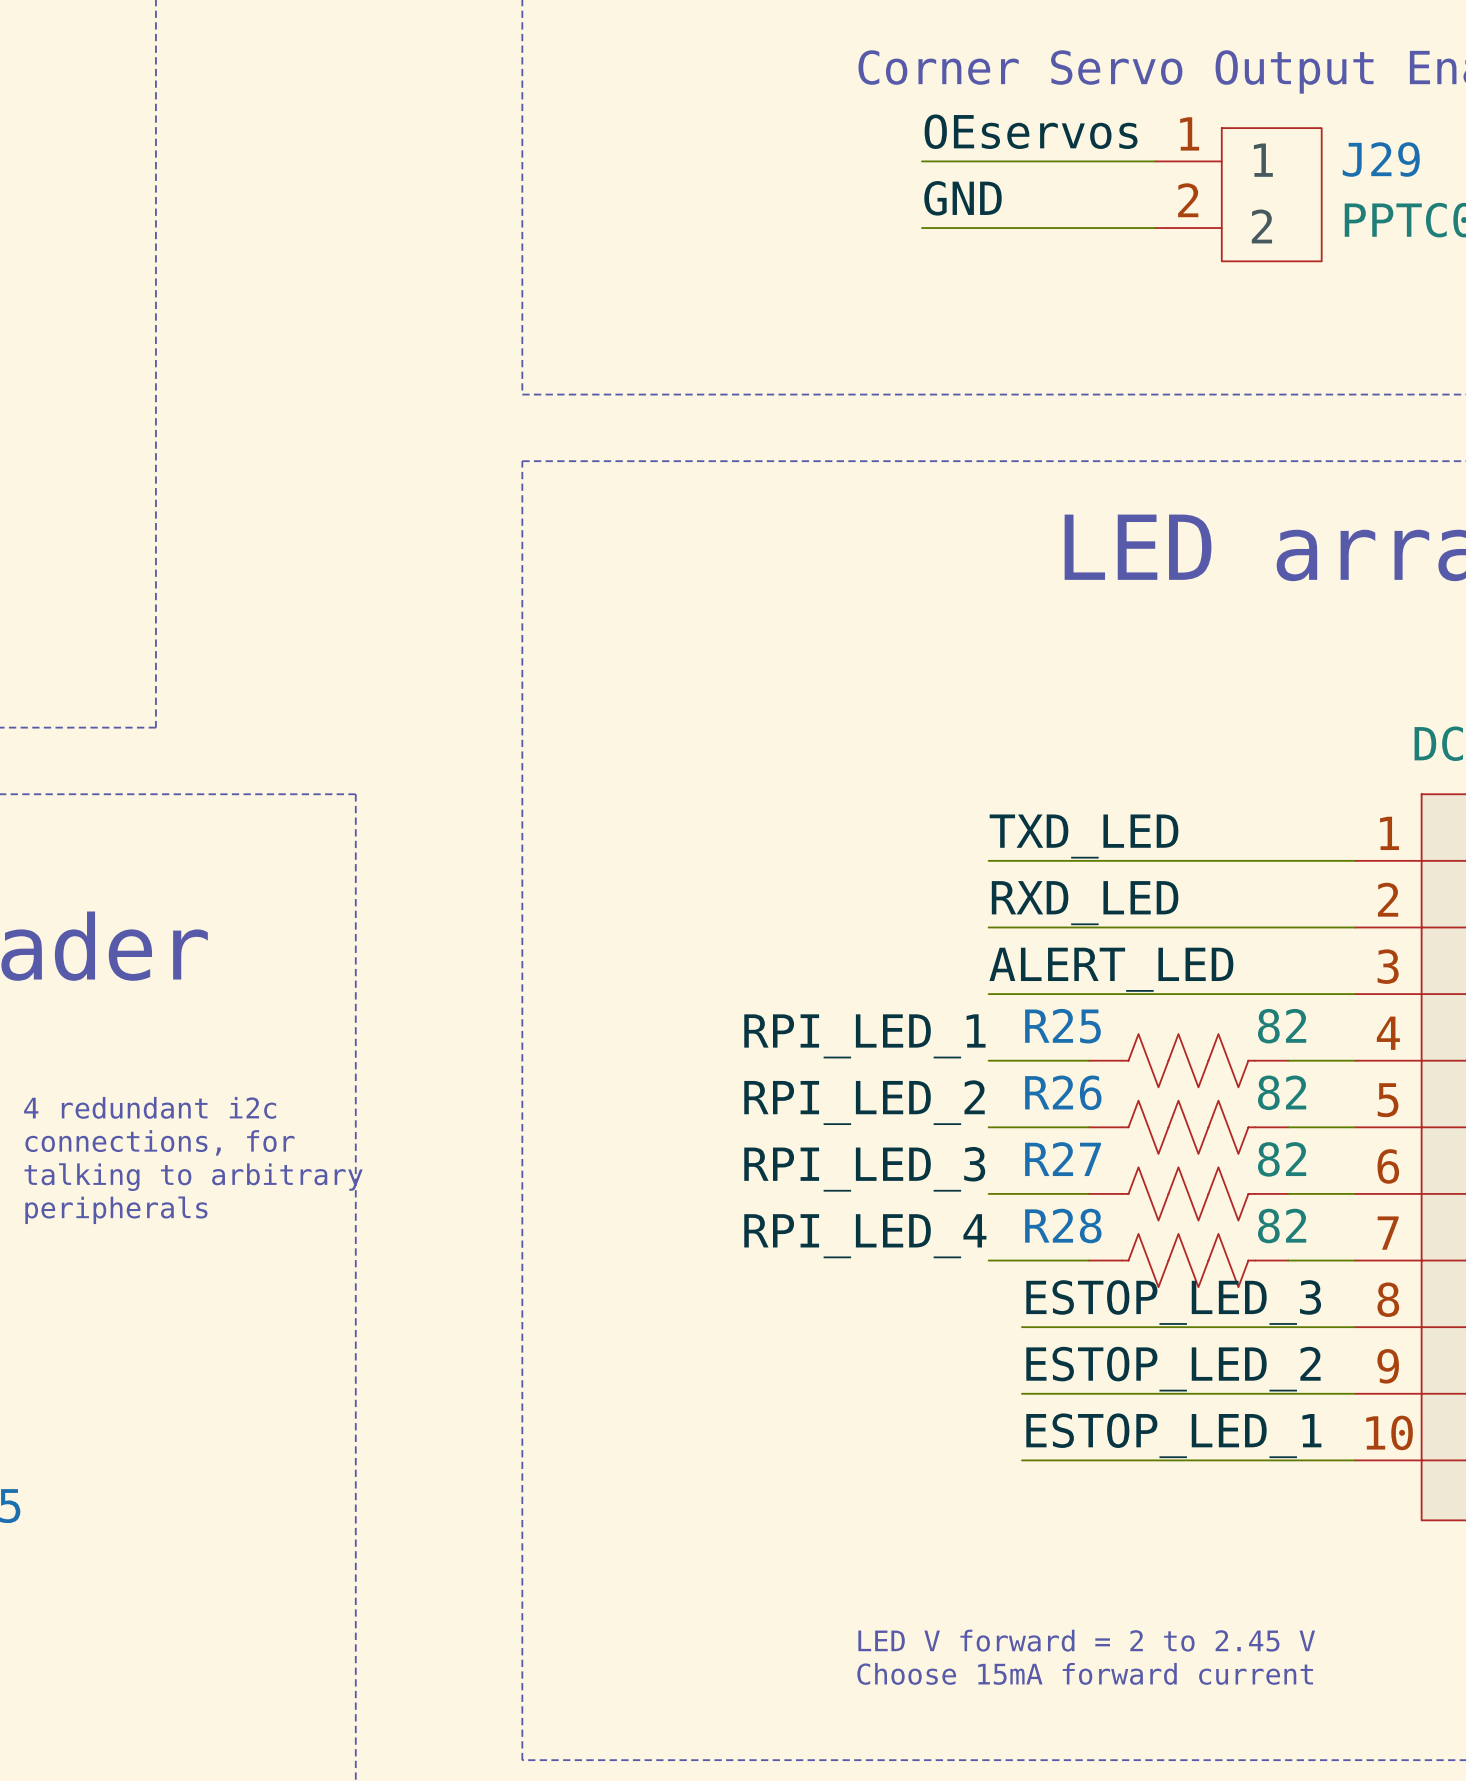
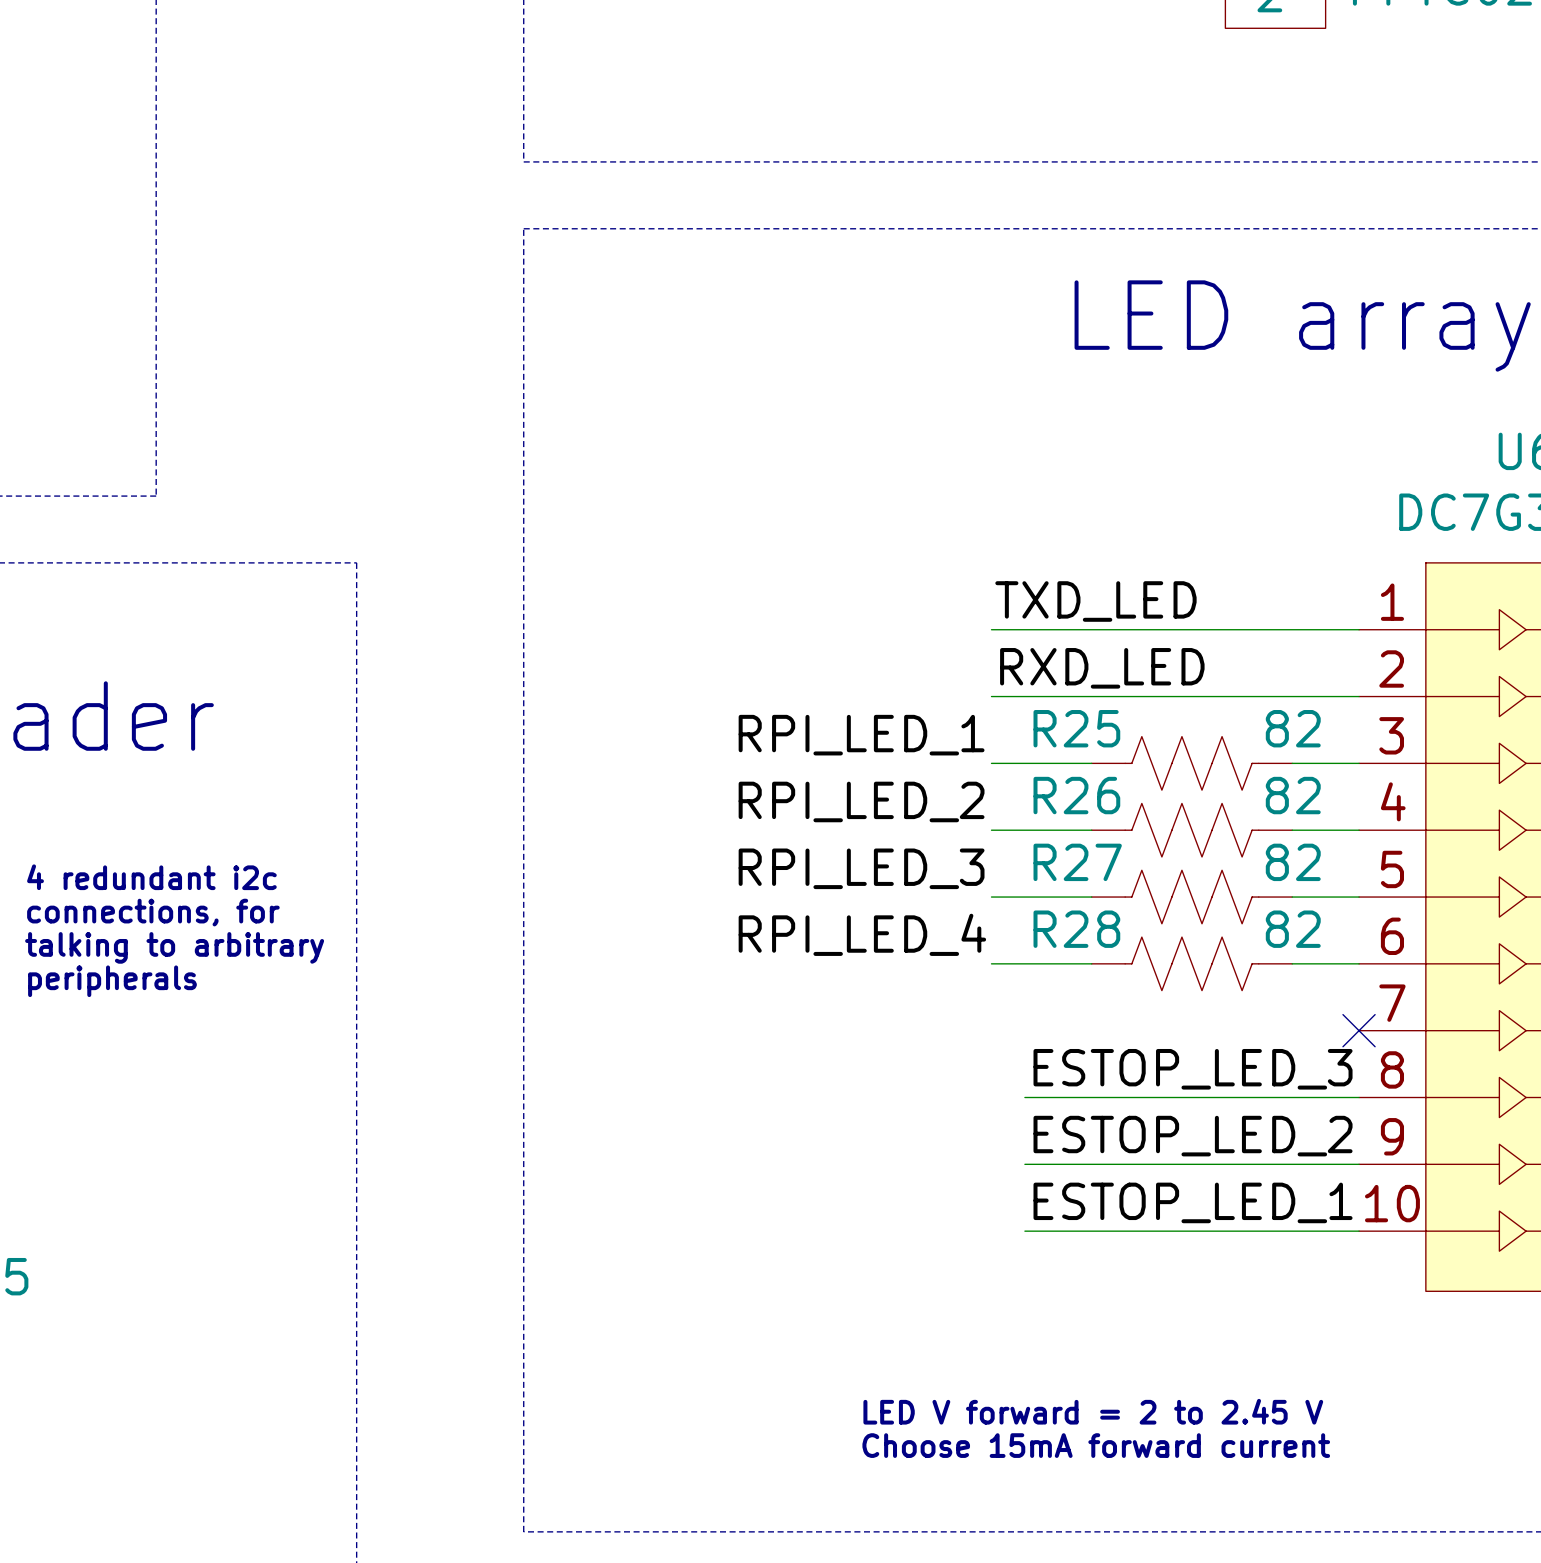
label: ALERT_LED (1111, 969) -> RPI_LED_1 (861, 735)
wire: (1088, 994) (1288, 994) -> none
R25: none -> 82 (1191, 763)
R25 name: R25 (1062, 1026) -> R26 (1076, 795)
label: RPI_LED_1 (864, 1036) -> RPI_LED_2 (861, 801)
R26 name: R26 (1063, 1092) -> R27 (1077, 862)
label: RPI_LED_2 (864, 1102) -> RPI_LED_3 (861, 868)
R27 name: R27 (1063, 1159) -> R28 (1076, 929)
label: RPI_LED_3 (864, 1169) -> RPI_LED_4 (862, 934)
label: RPI_LED_4 (865, 1236) -> none
wire: (988, 1260) (1088, 1260) -> none
R28: 82 (1188, 1260) -> none
wire: (1288, 1260) (1355, 1260) -> none
no-connect mark: none -> (1359, 1030)

